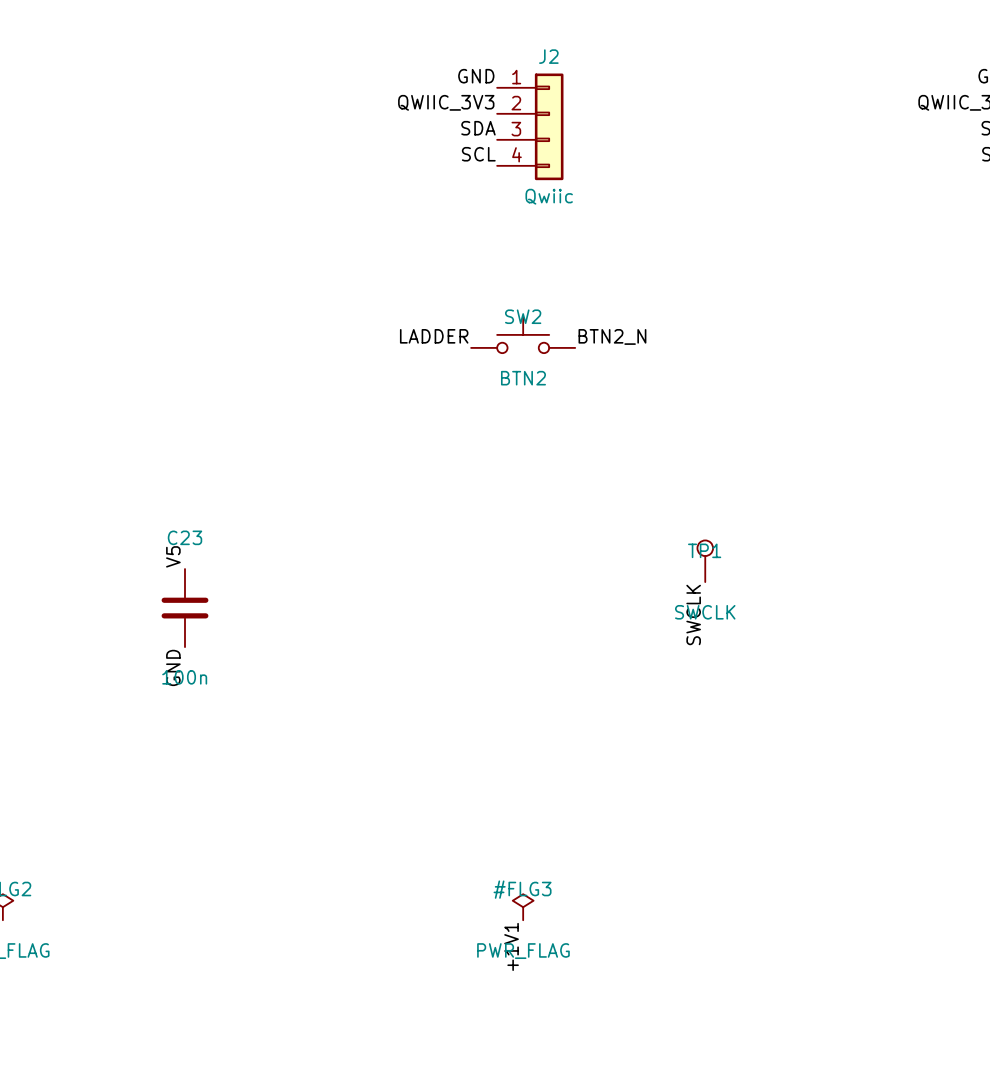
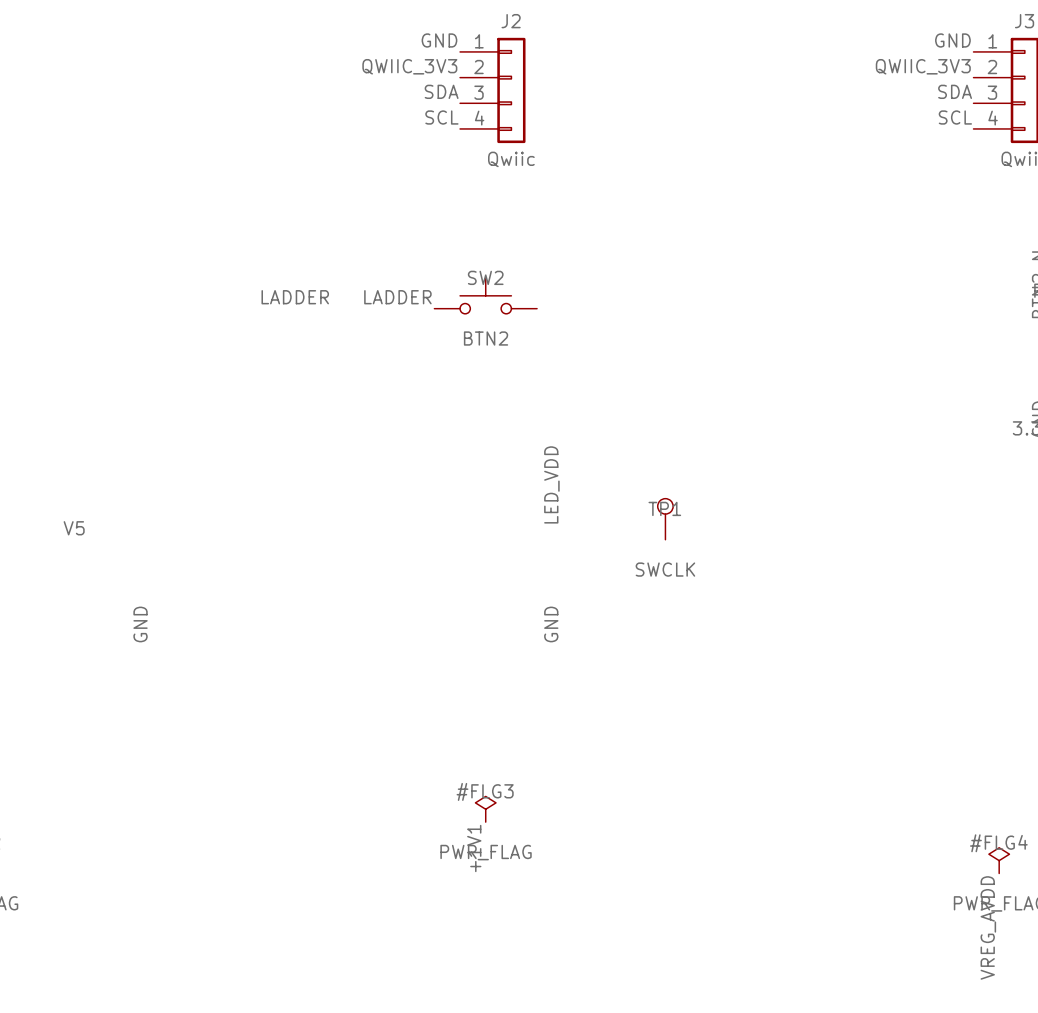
label: none -> LADDER (295, 297)
label: BTN2_N (612, 336) -> none
label: none -> LED_VDD (551, 484)
label rotation: 0° (173, 556) -> 90° clockwise (74, 528)
label position: V5 (173, 556) -> V5 (74, 528)
C23: 100n (185, 608) -> none
label: SWCLK (693, 614) -> none
label: none -> GND (551, 624)
#FLG3 position: PWR_FLAG (523, 907) -> PWR_FLAG (485, 809)
label position: +1V1 (511, 946) -> +1V1 (474, 848)

